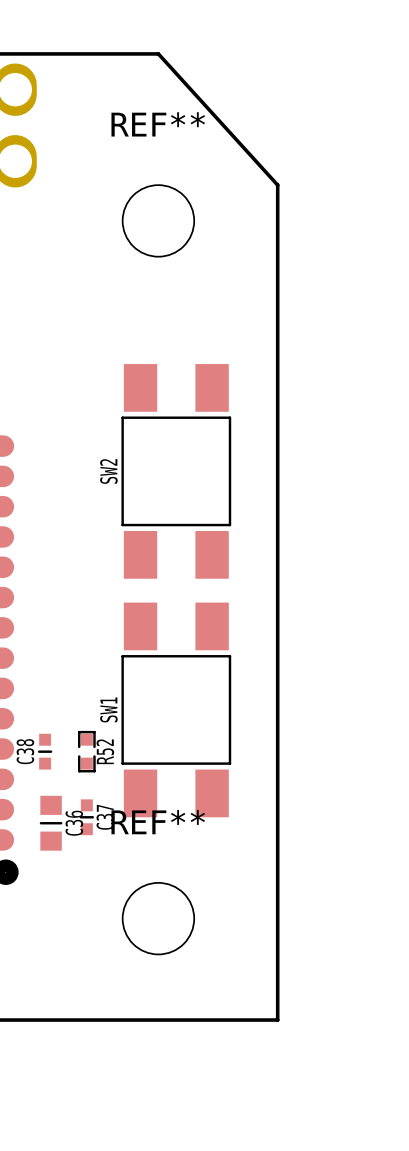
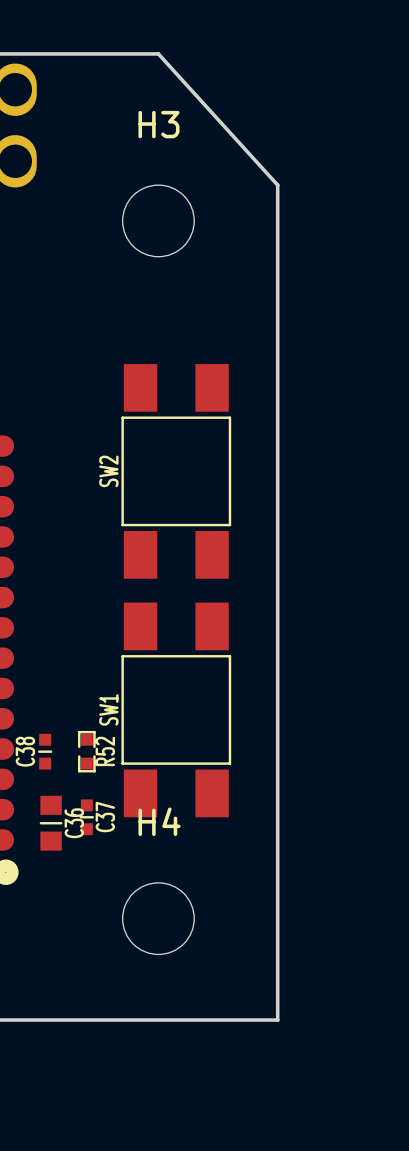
REF** name: REF** (158, 124) -> H3 (158, 124)
REF** name: REF** (158, 822) -> H4 (159, 821)

